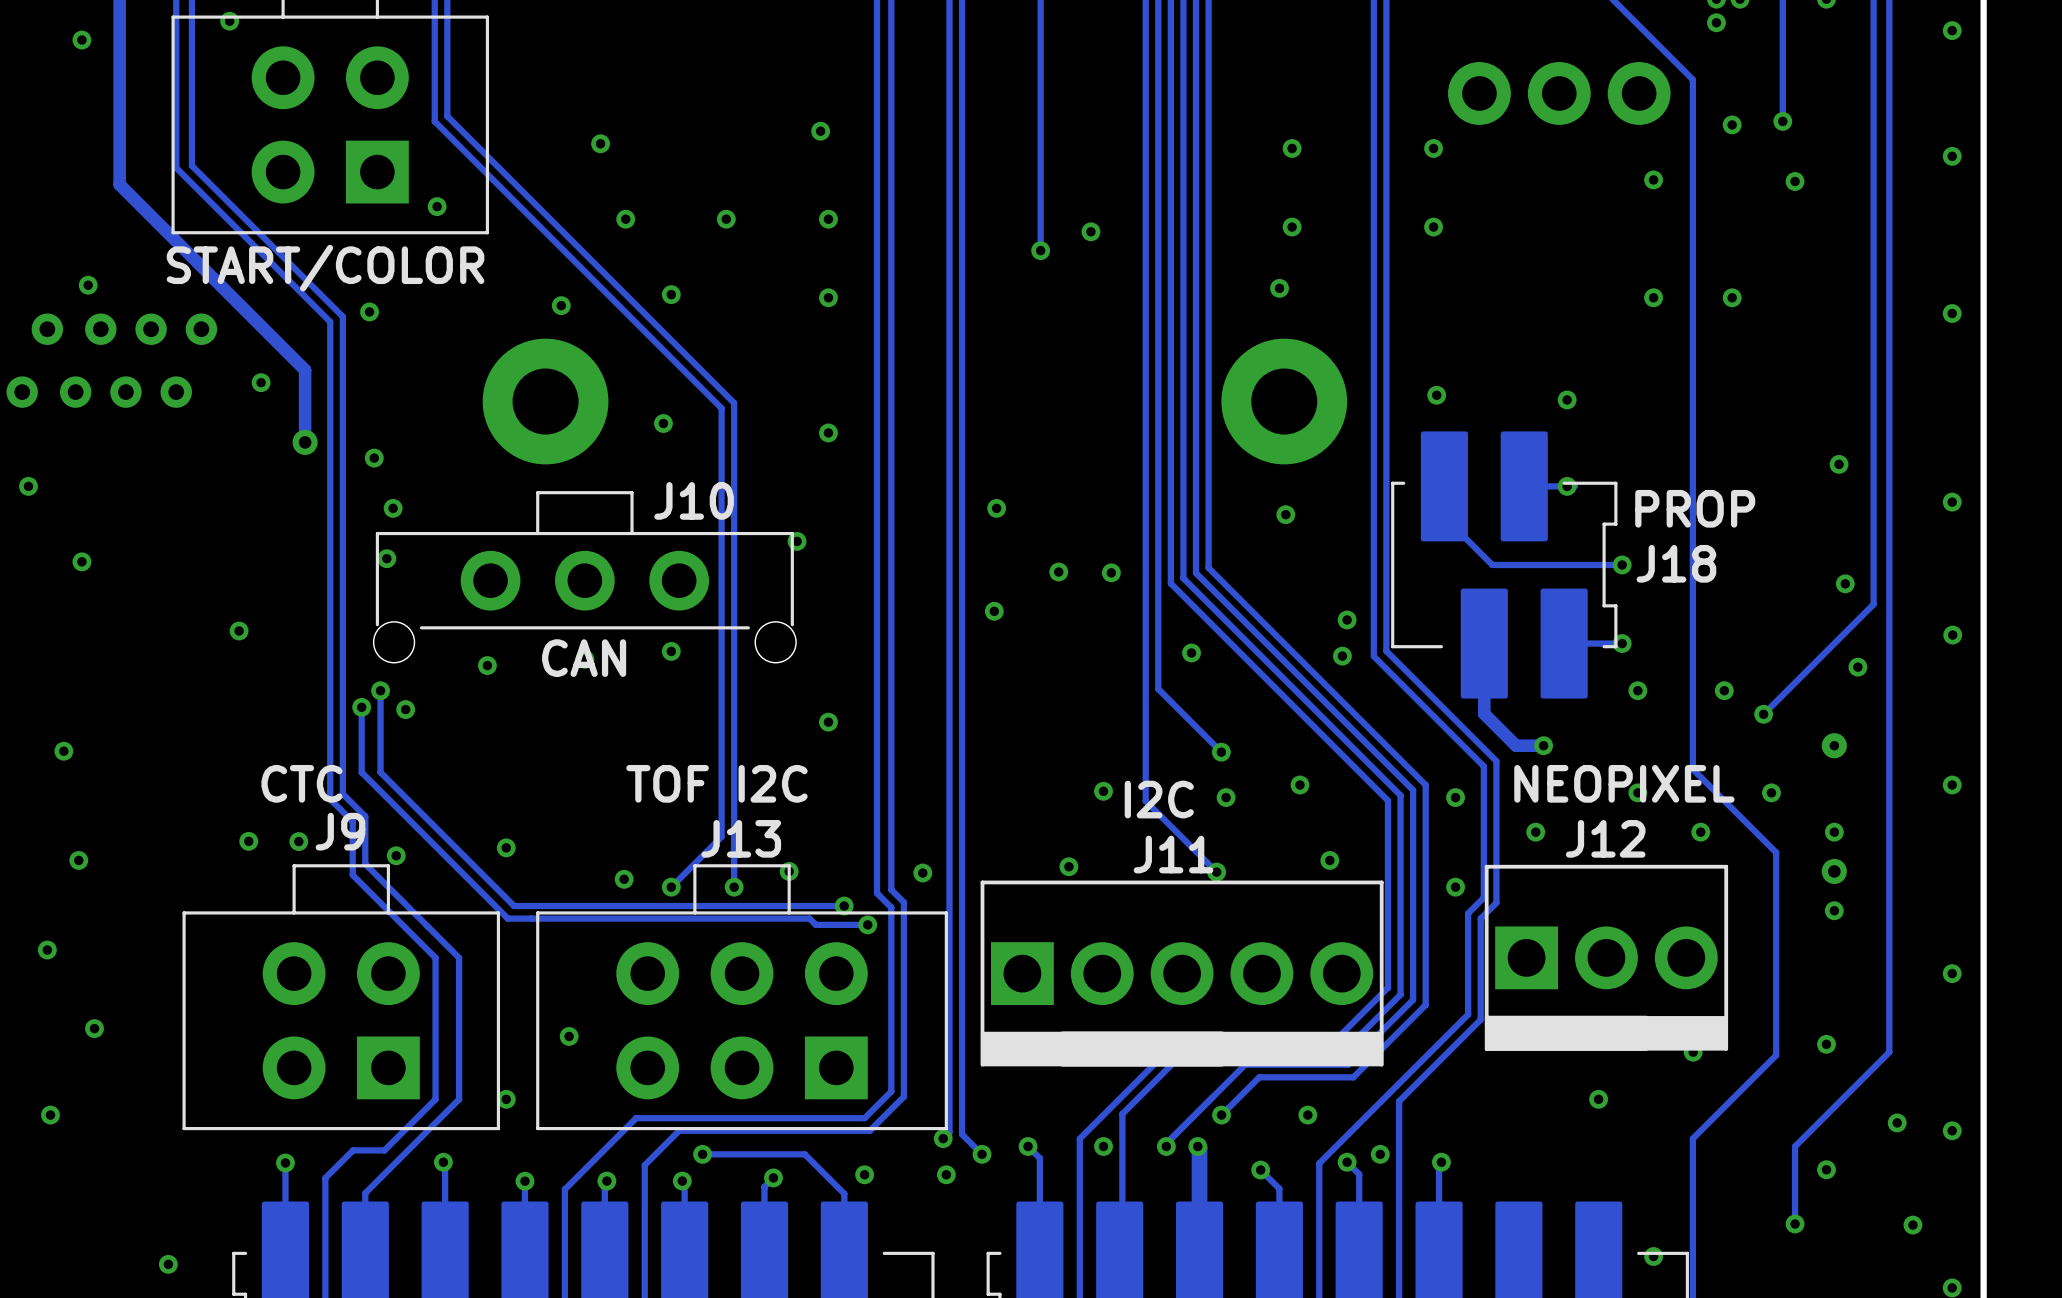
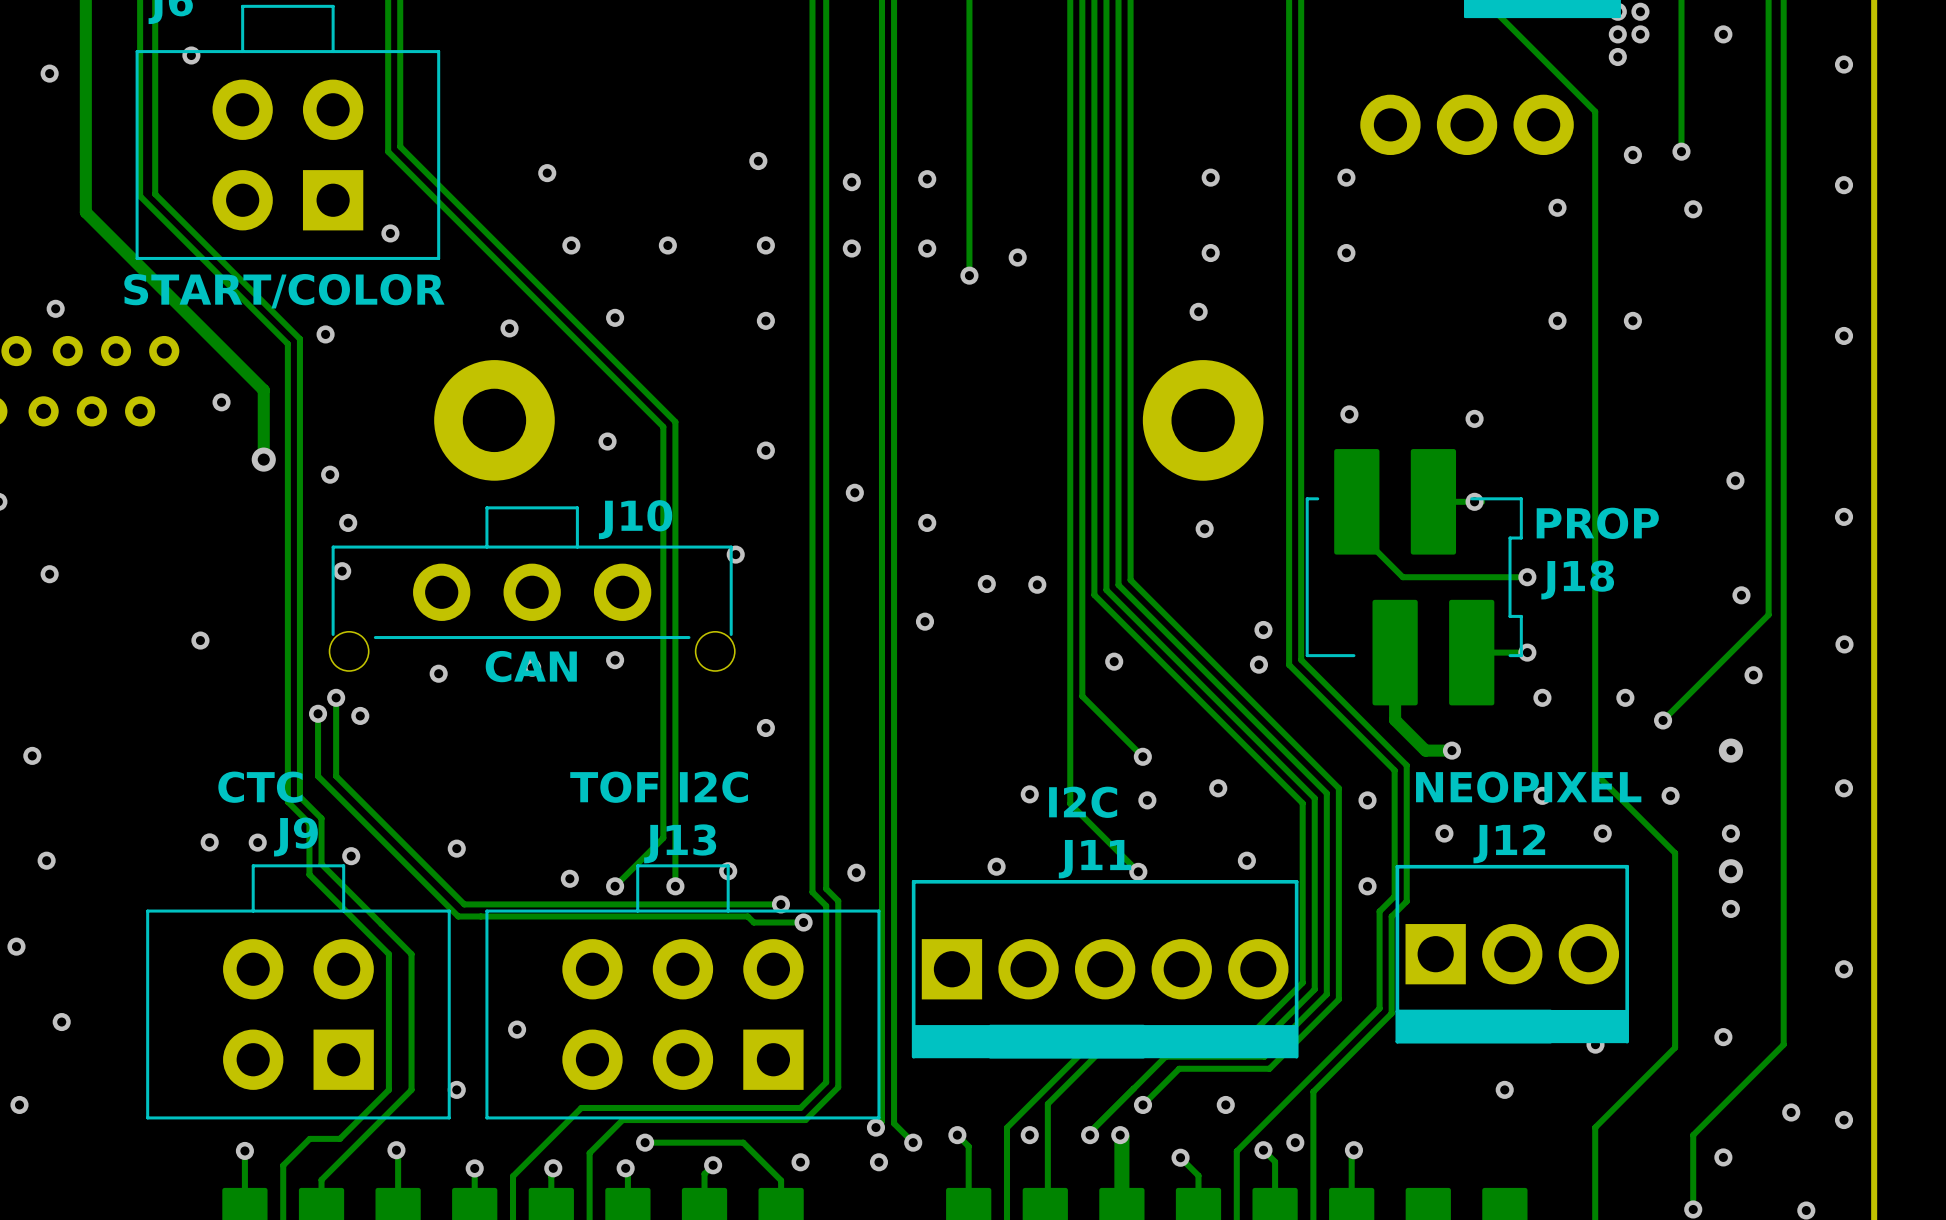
via: none -> (927, 179)
via: none -> (851, 182)
via: none -> (851, 248)
via: none -> (927, 248)
via: none -> (854, 492)

